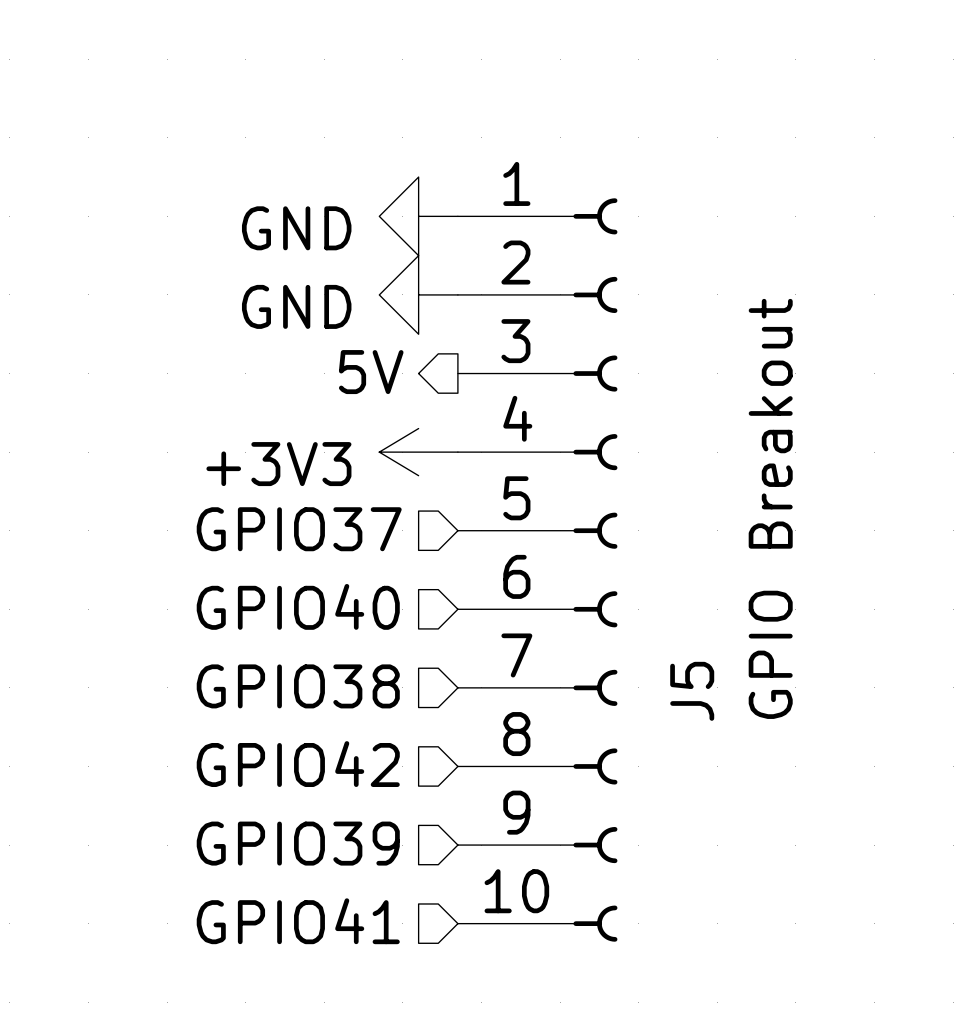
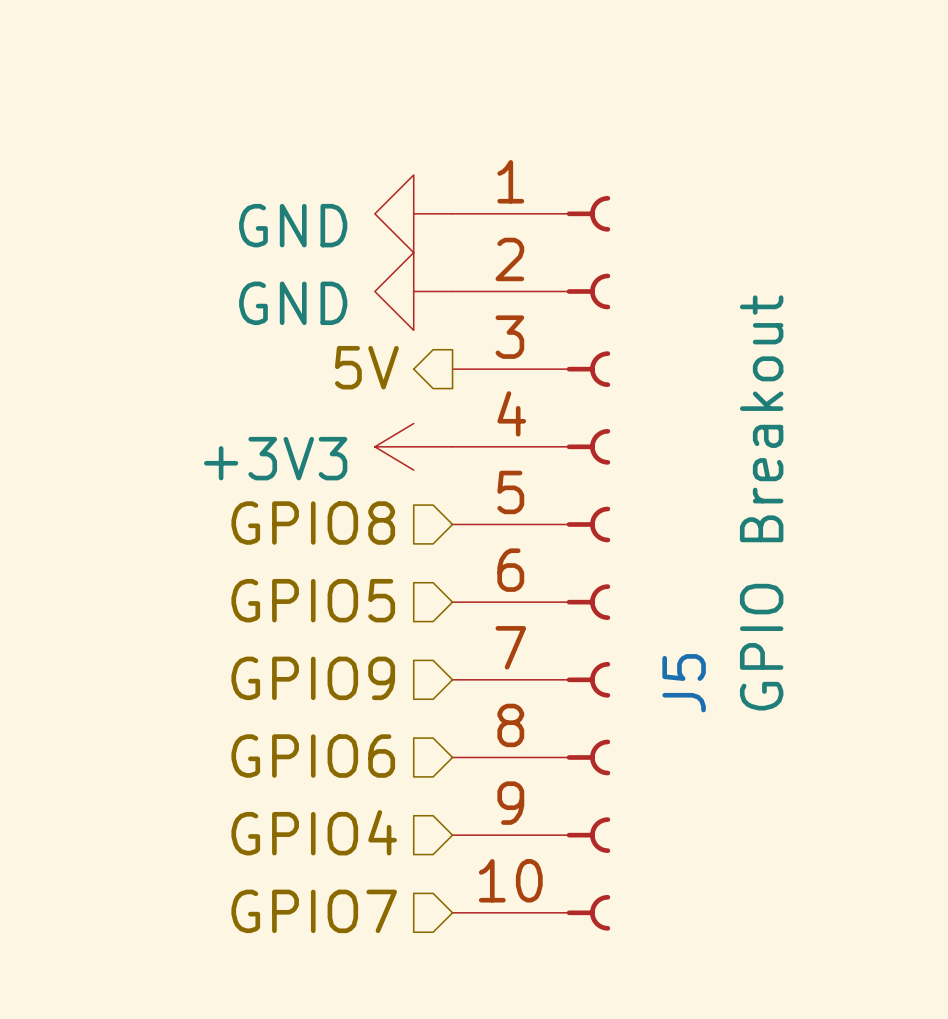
hierarchical label: GPIO37 (299, 529) -> GPIO8 (313, 523)
hierarchical label: GPIO40 (298, 606) -> GPIO5 (313, 600)
hierarchical label: GPIO38 (298, 686) -> GPIO9 (313, 678)
hierarchical label: GPIO42 (298, 764) -> GPIO6 (313, 756)
hierarchical label: GPIO39 (298, 843) -> GPIO4 (314, 832)
hierarchical label: GPIO41 (298, 921) -> GPIO7 (314, 911)

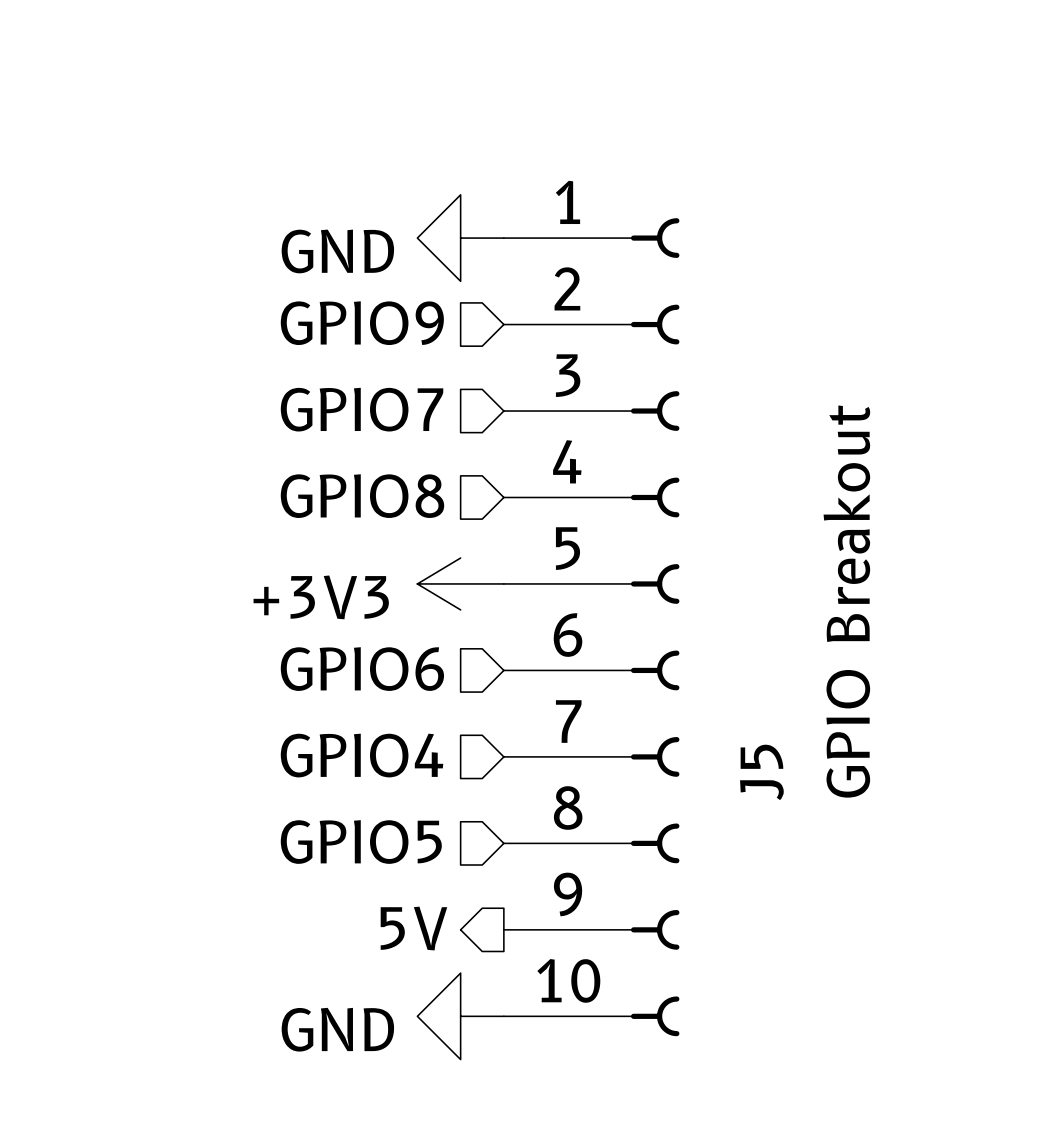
hierarchical label: none -> GPIO9 (362, 323)
power symbol position: GND (413, 291) -> GND (460, 1016)
hierarchical label shape: output (366, 367) -> input (362, 409)
hierarchical label: 5V (366, 367) -> GPIO7 (362, 409)
power symbol position: +3V3 (413, 446) -> +3V3 (460, 583)
hierarchical label position: GPIO8 (313, 523) -> GPIO8 (362, 496)
hierarchical label: GPIO5 (313, 600) -> GPIO6 (362, 669)
hierarchical label: GPIO9 (313, 678) -> GPIO4 (362, 755)
hierarchical label: GPIO6 (313, 756) -> GPIO5 (361, 842)
hierarchical label shape: input (314, 832) -> output (413, 928)
hierarchical label: GPIO4 (314, 832) -> 5V (413, 928)
hierarchical label: GPIO7 (314, 911) -> none

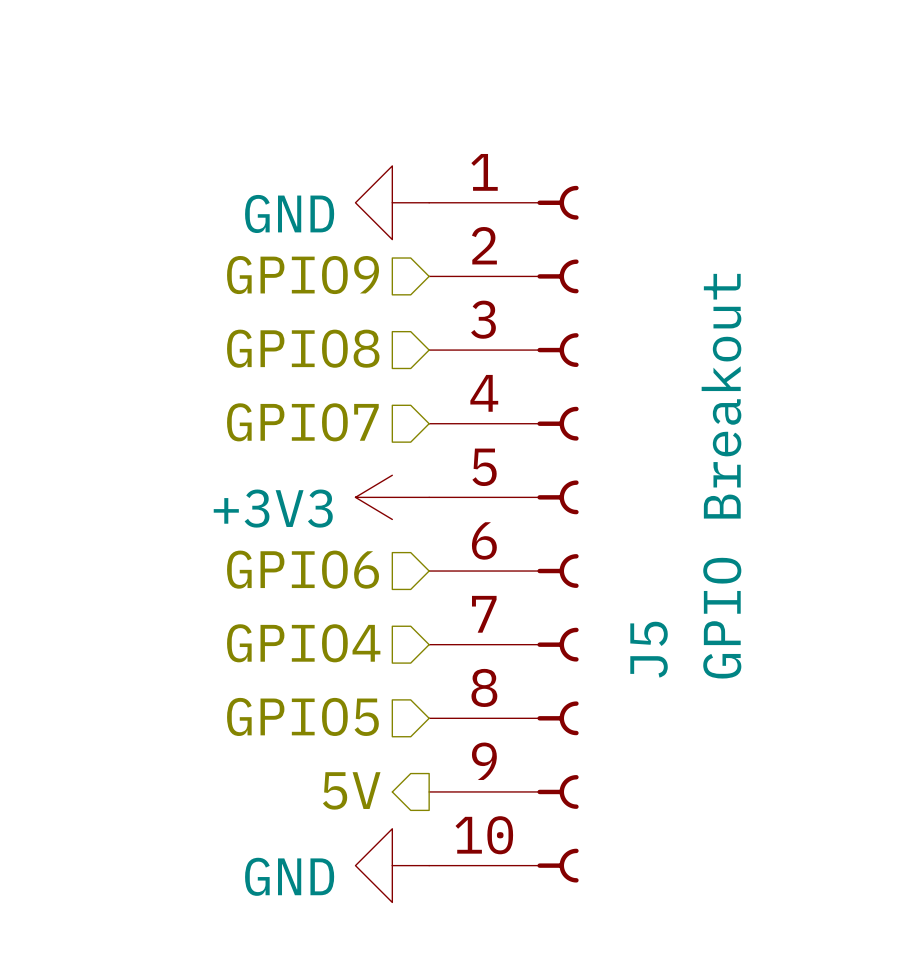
hierarchical label: GPIO7 (362, 409) -> GPIO8 (303, 348)
hierarchical label: GPIO8 (362, 496) -> GPIO7 (302, 422)

